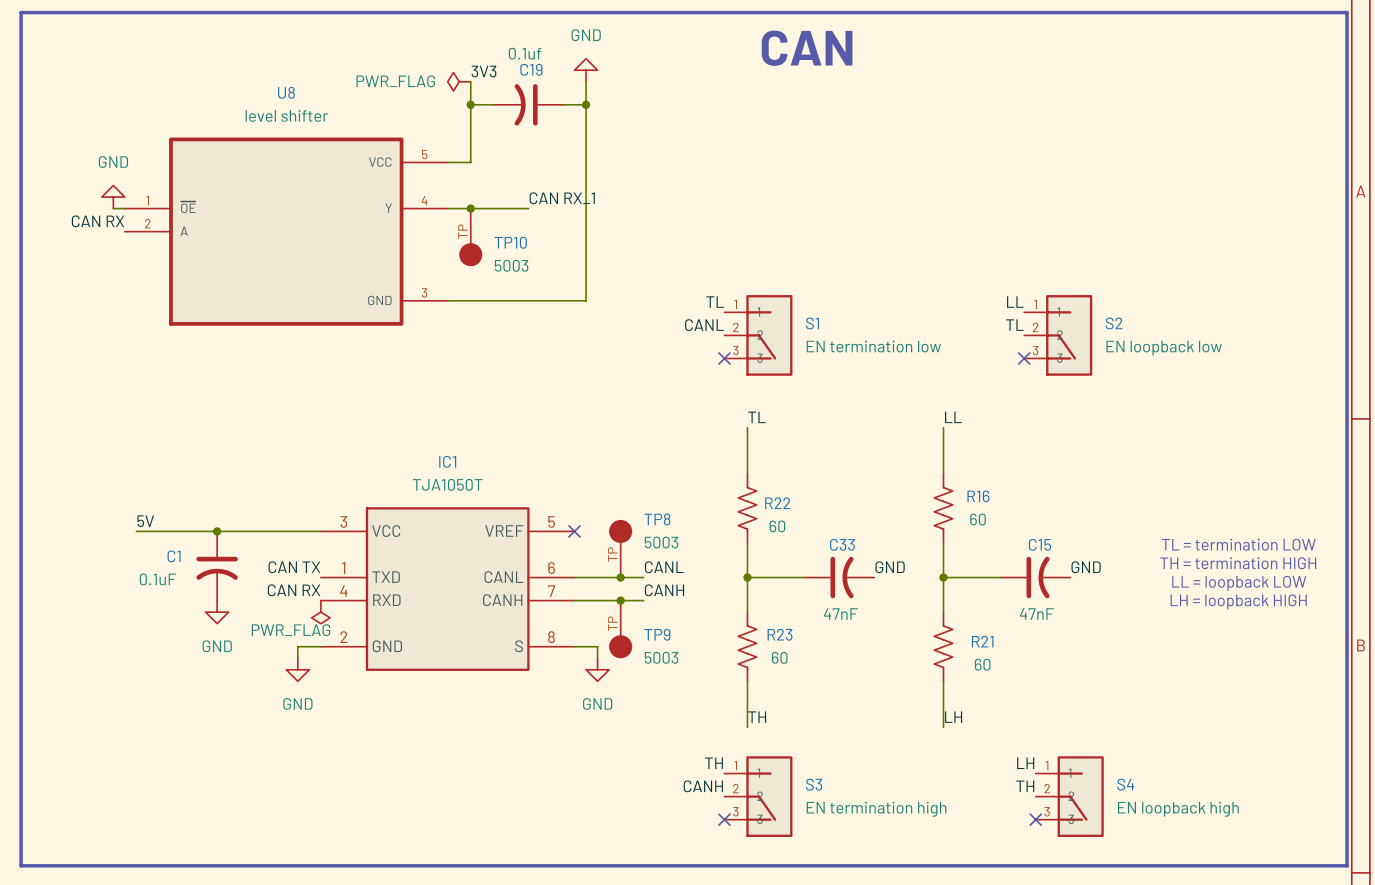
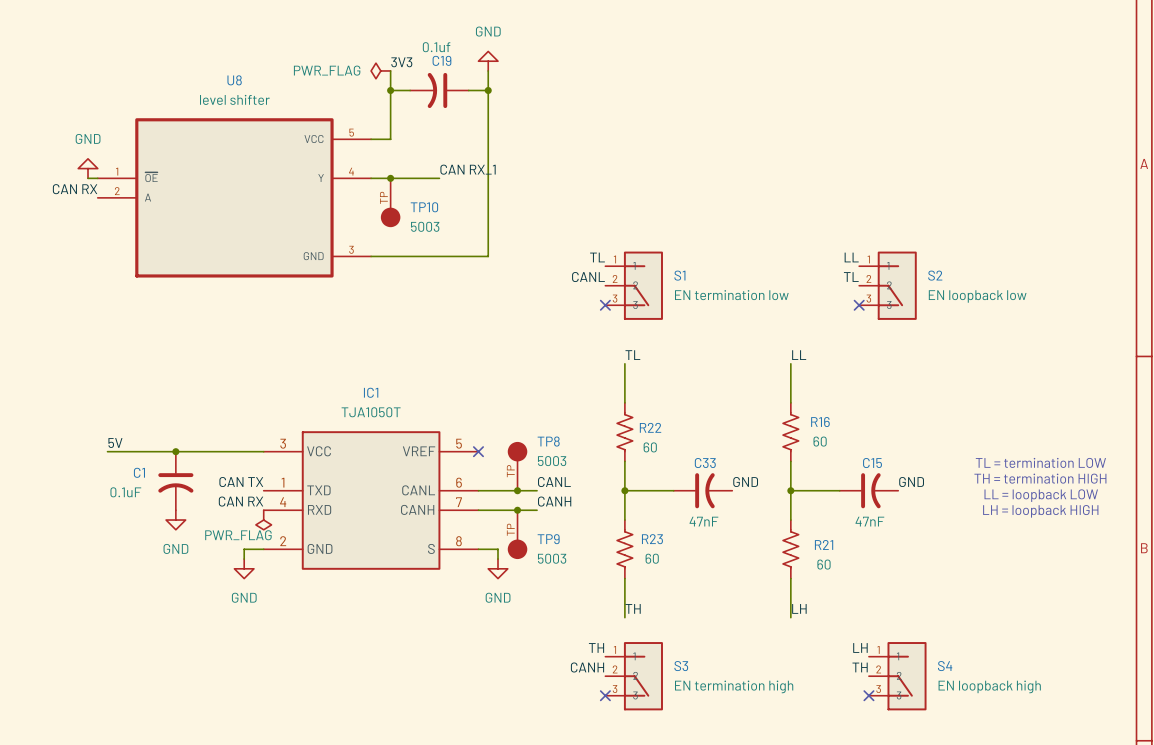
line: (21, 12) (1347, 12) (1347, 865) (21, 865) (21, 12) -> none
text: CAN (807, 48) -> none

